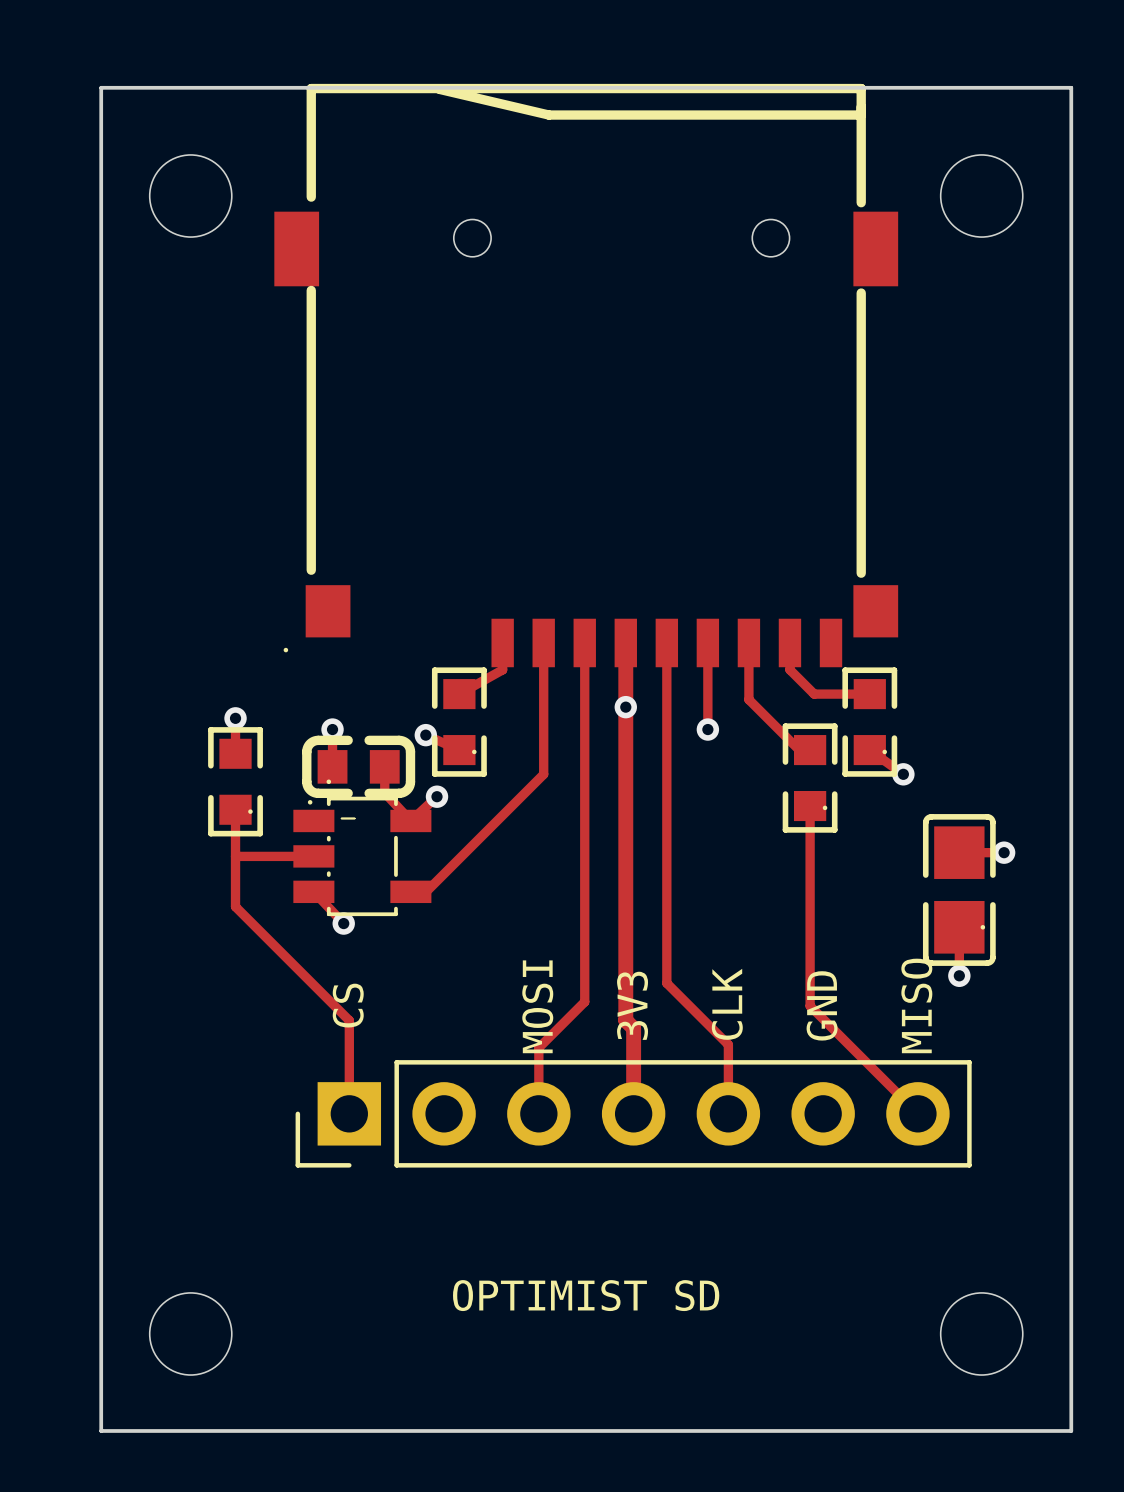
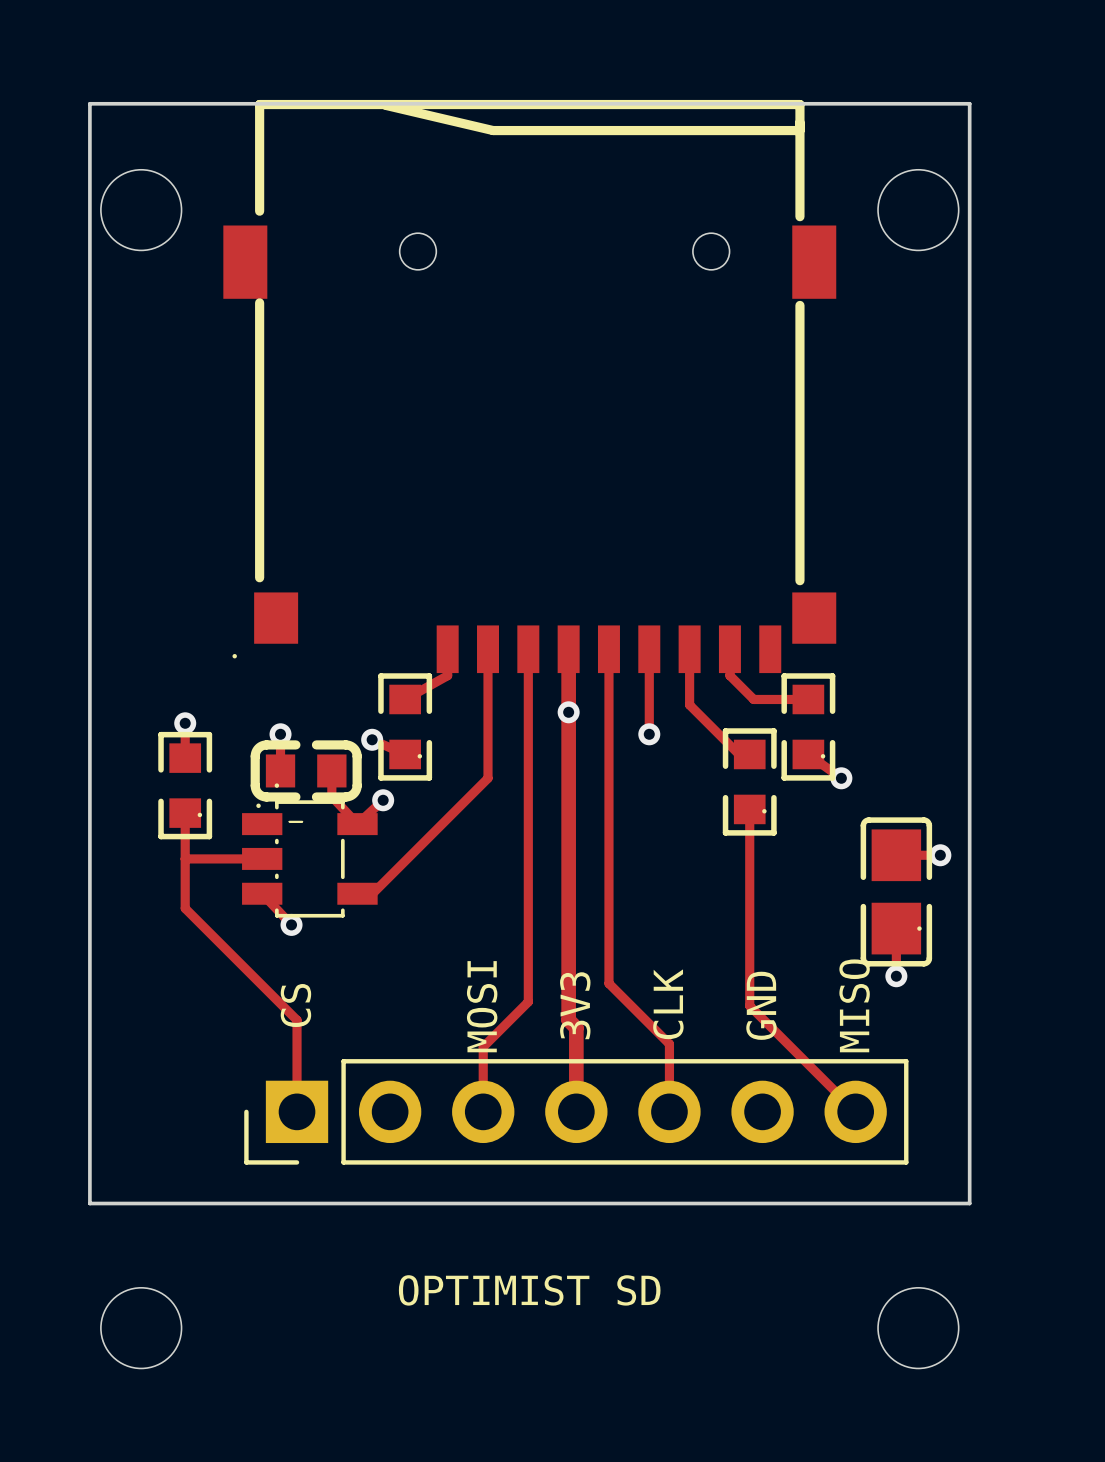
board edge: (138, 87) (101, 87) (101, 1430) (1071, 1430) (1071, 87) (1033, 87) -> (89, 103) (89, 1203) (969, 1203) (969, 103)

